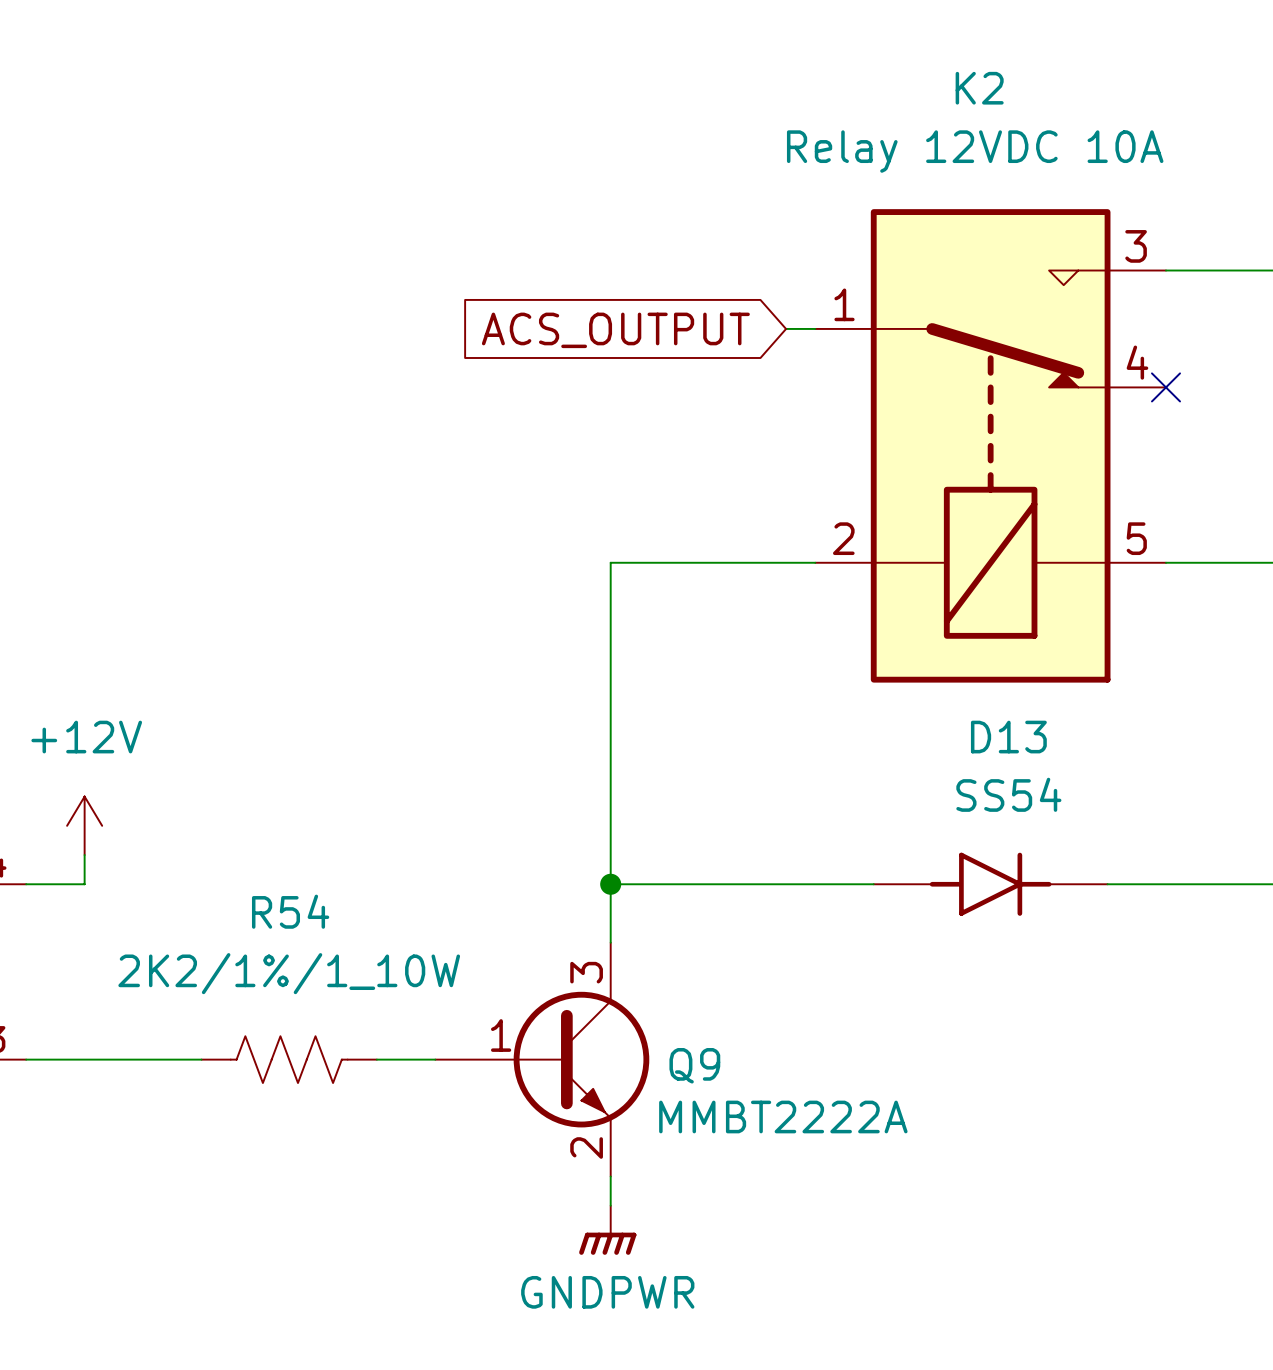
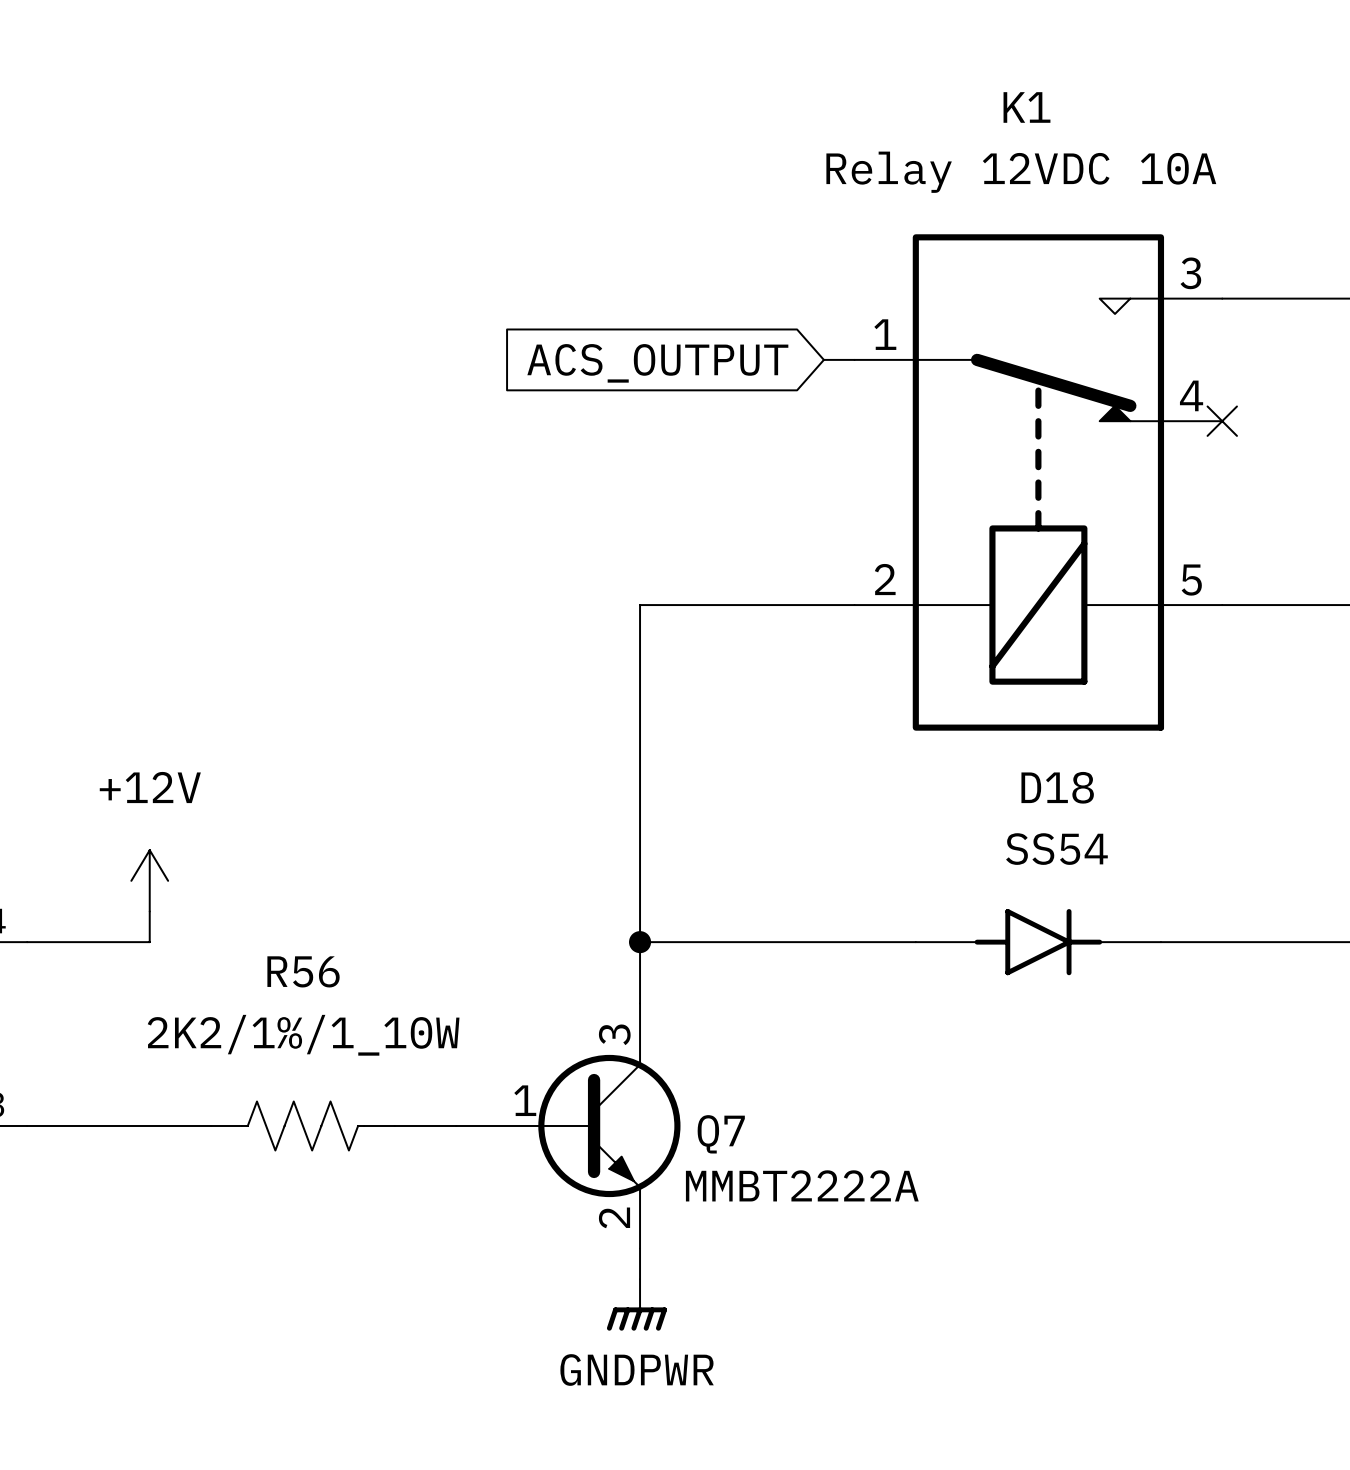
K2 name: K2 (979, 88) -> K1 (1026, 107)
D13 name: D13 (1008, 737) -> D18 (1057, 787)
power symbol position: +12V (84, 825) -> +12V (149, 880)
wire: (84, 855) (84, 884) -> (149, 911) (149, 942) (88, 942)
R54 name: R54 (290, 911) -> R56 (303, 971)
Q9 name: Q9 (694, 1065) -> Q7 (721, 1134)

